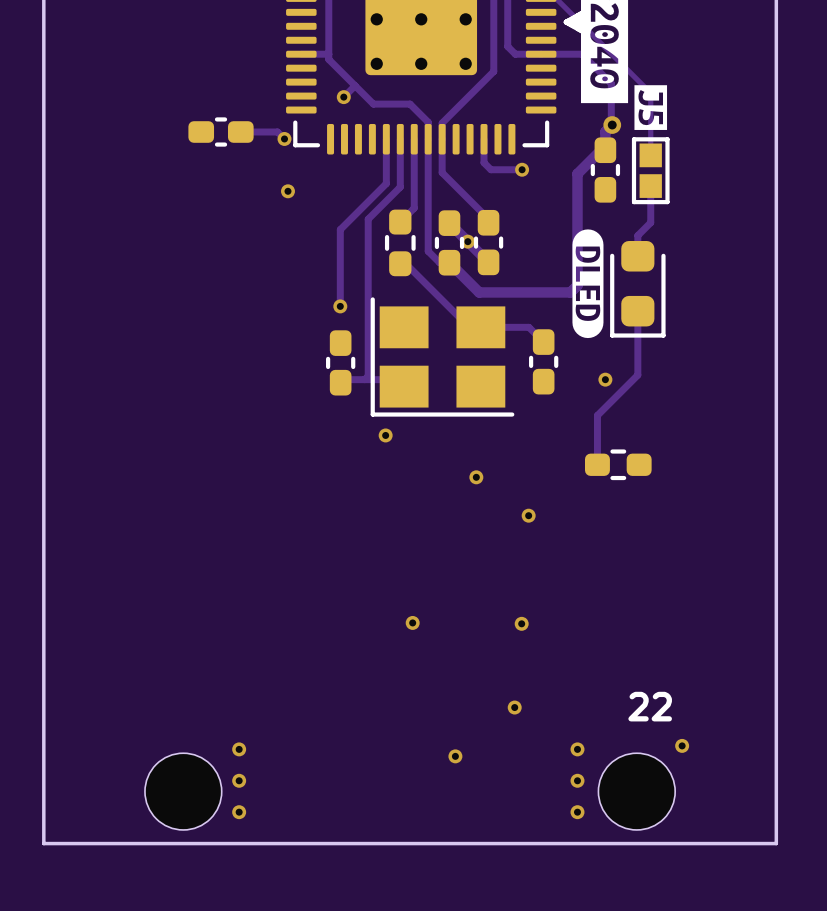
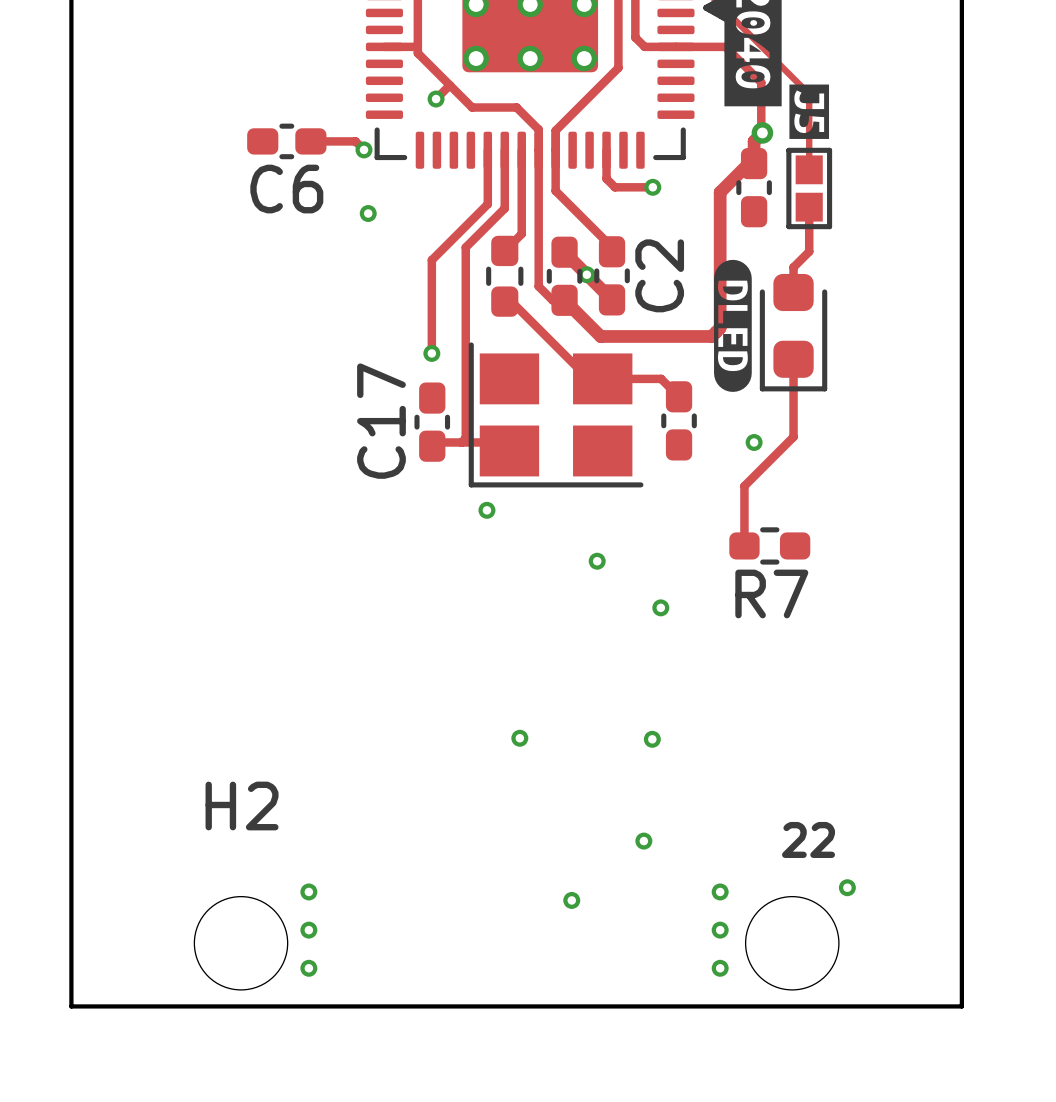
C6 name: none -> C6 (286, 189)
C2 name: none -> C2 (659, 275)
C17 name: none -> C17 (381, 421)
R7 name: none -> R7 (771, 593)
H2 name: none -> H2 (242, 805)

